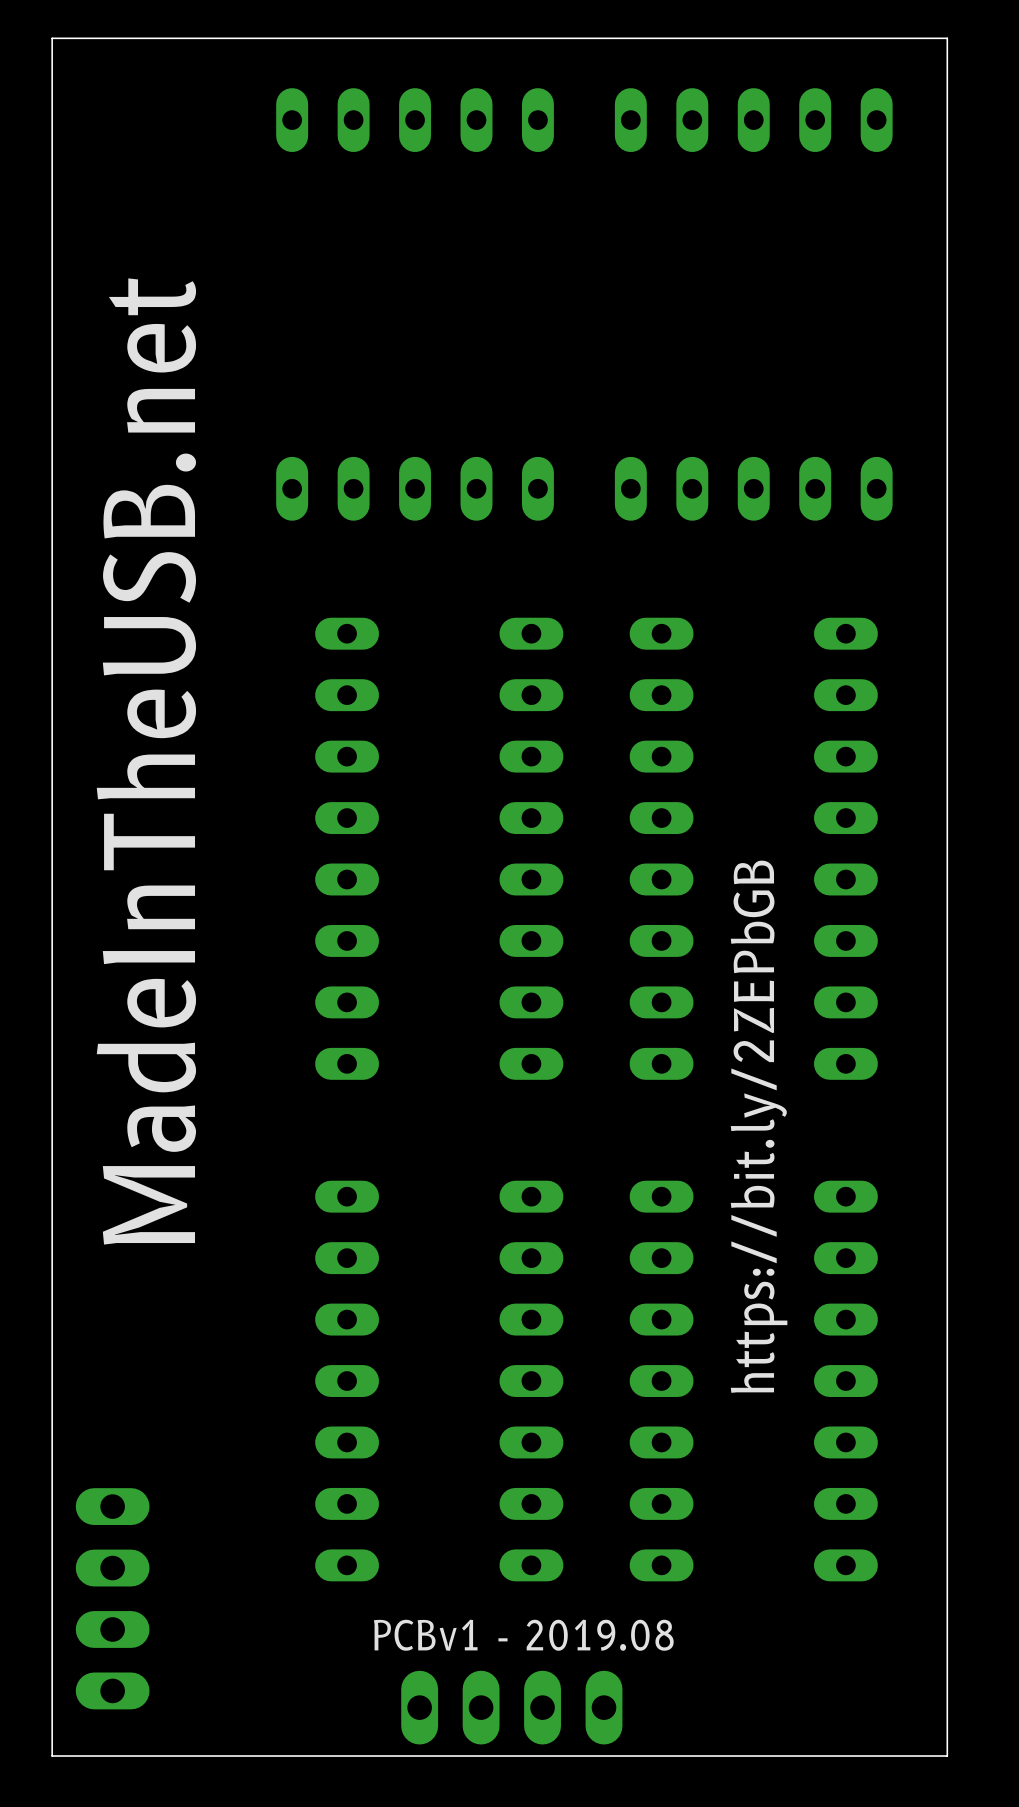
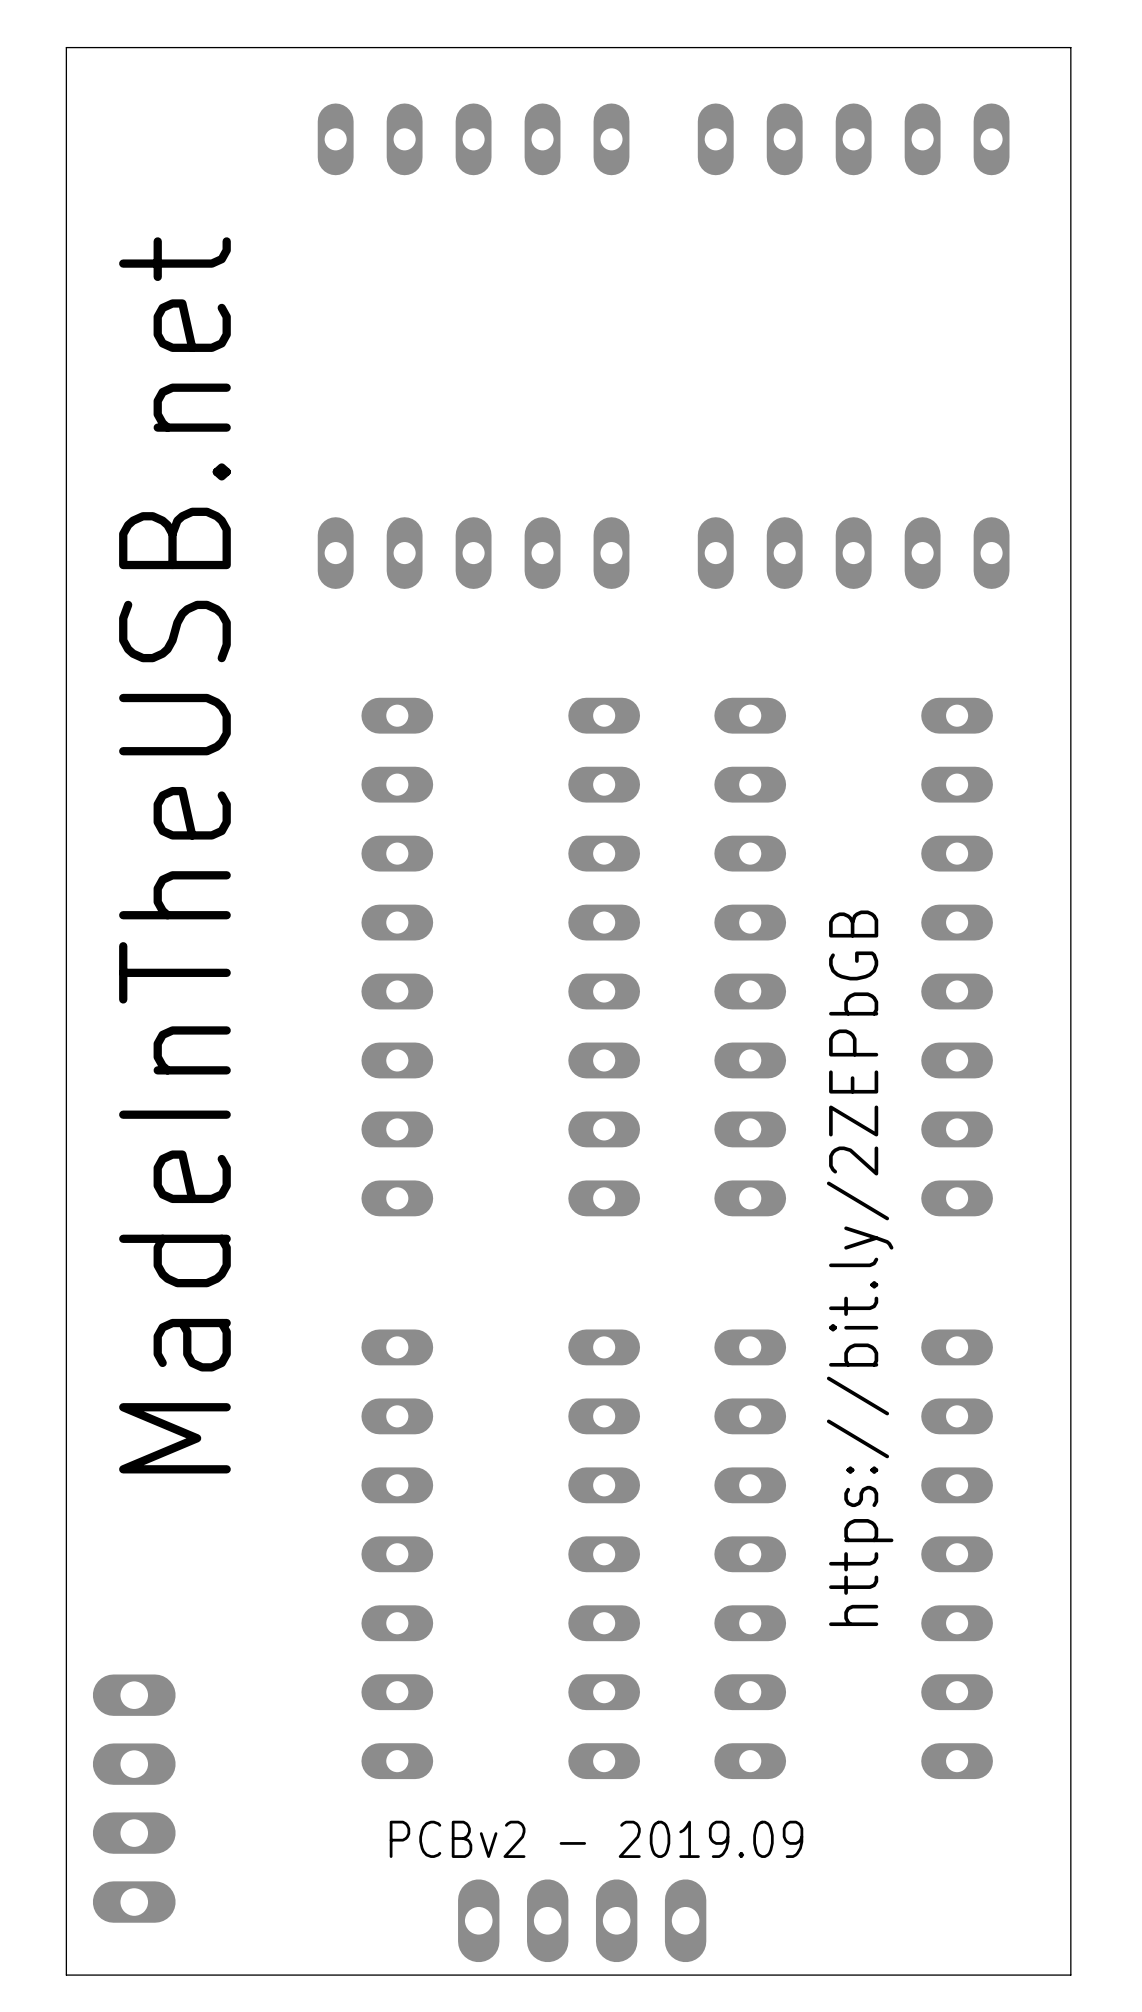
text: PCBv1 - 2019.08 (523, 1635) -> PCBv2 - 2019.09 (596, 1839)

